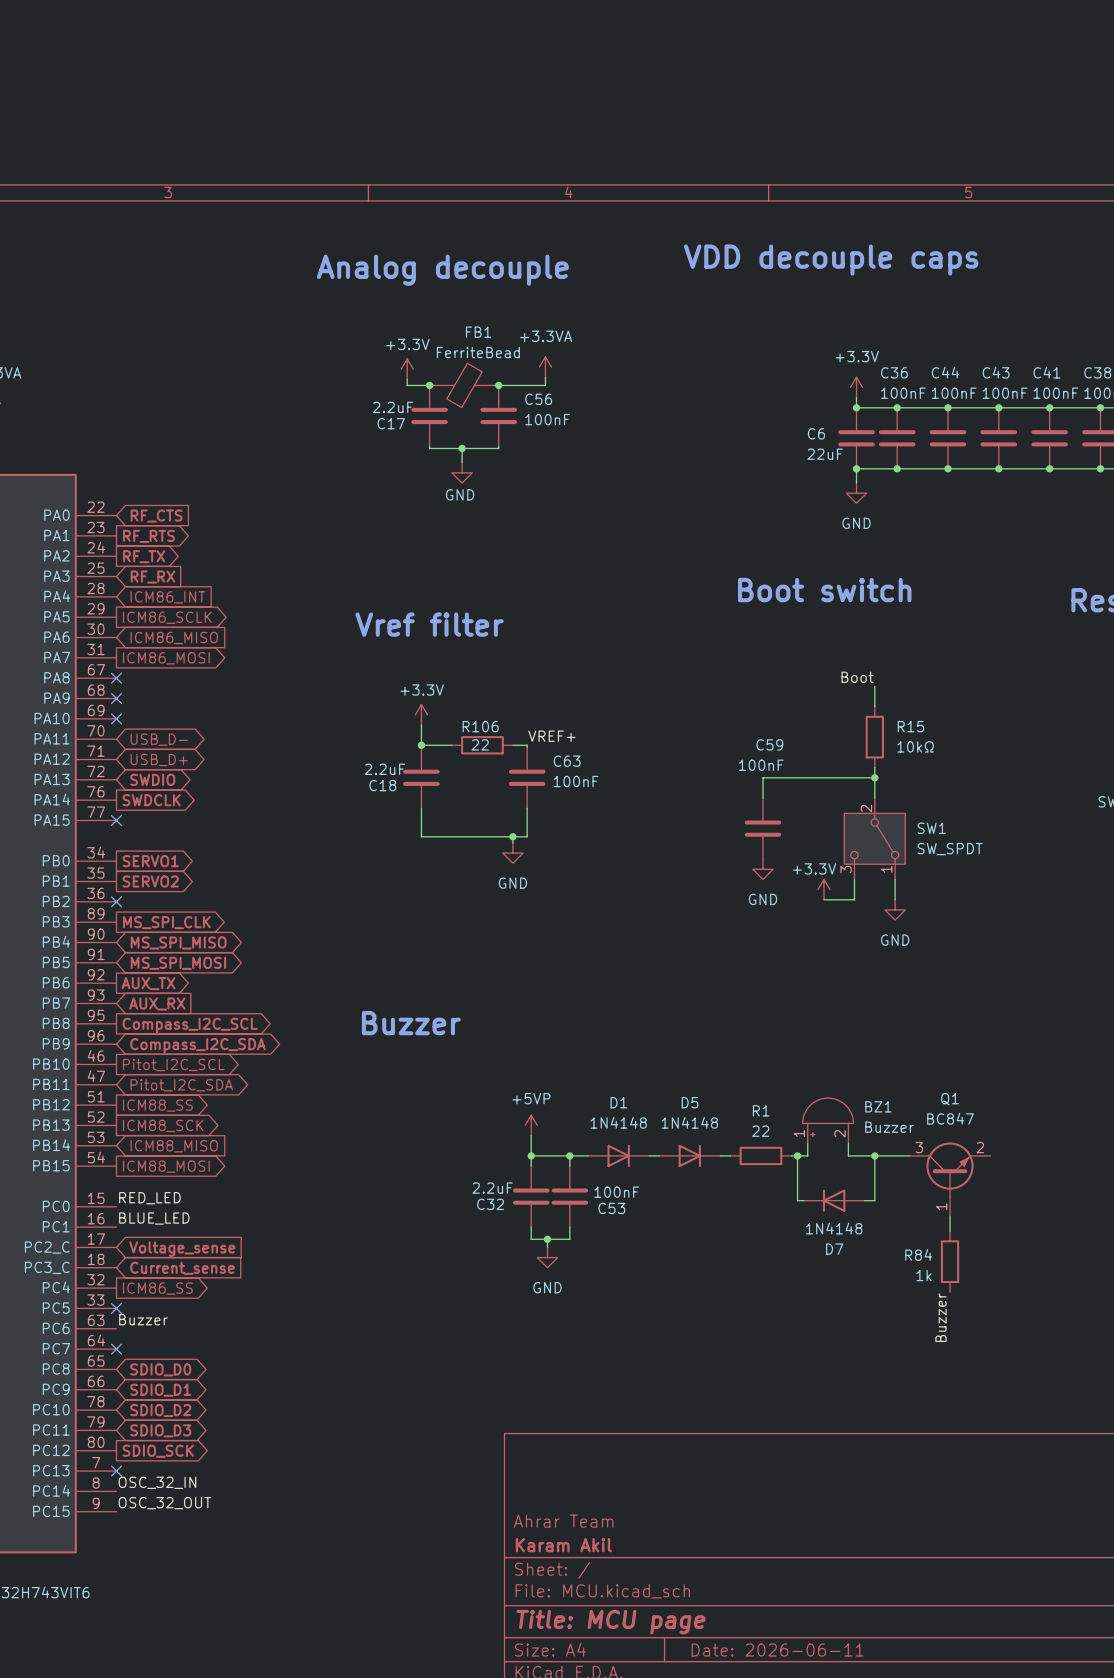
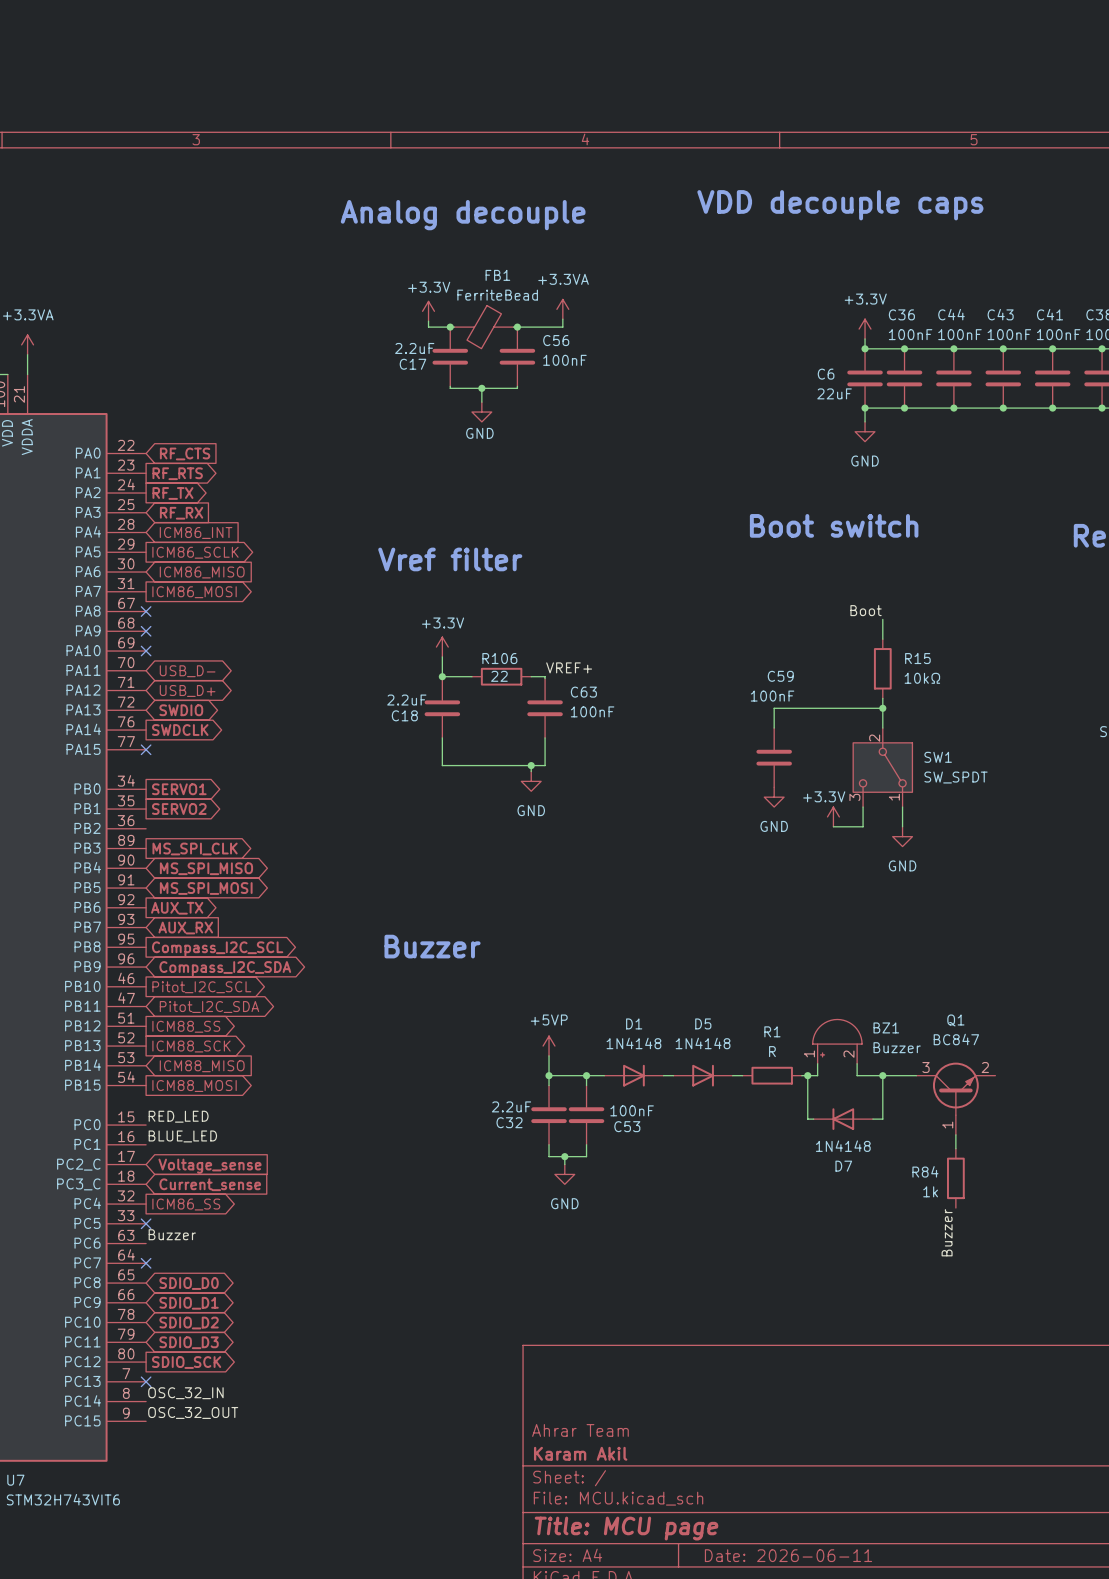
no-connect mark: (116, 901) -> none
R1 value: 22 (760, 1131) -> R (772, 1051)

